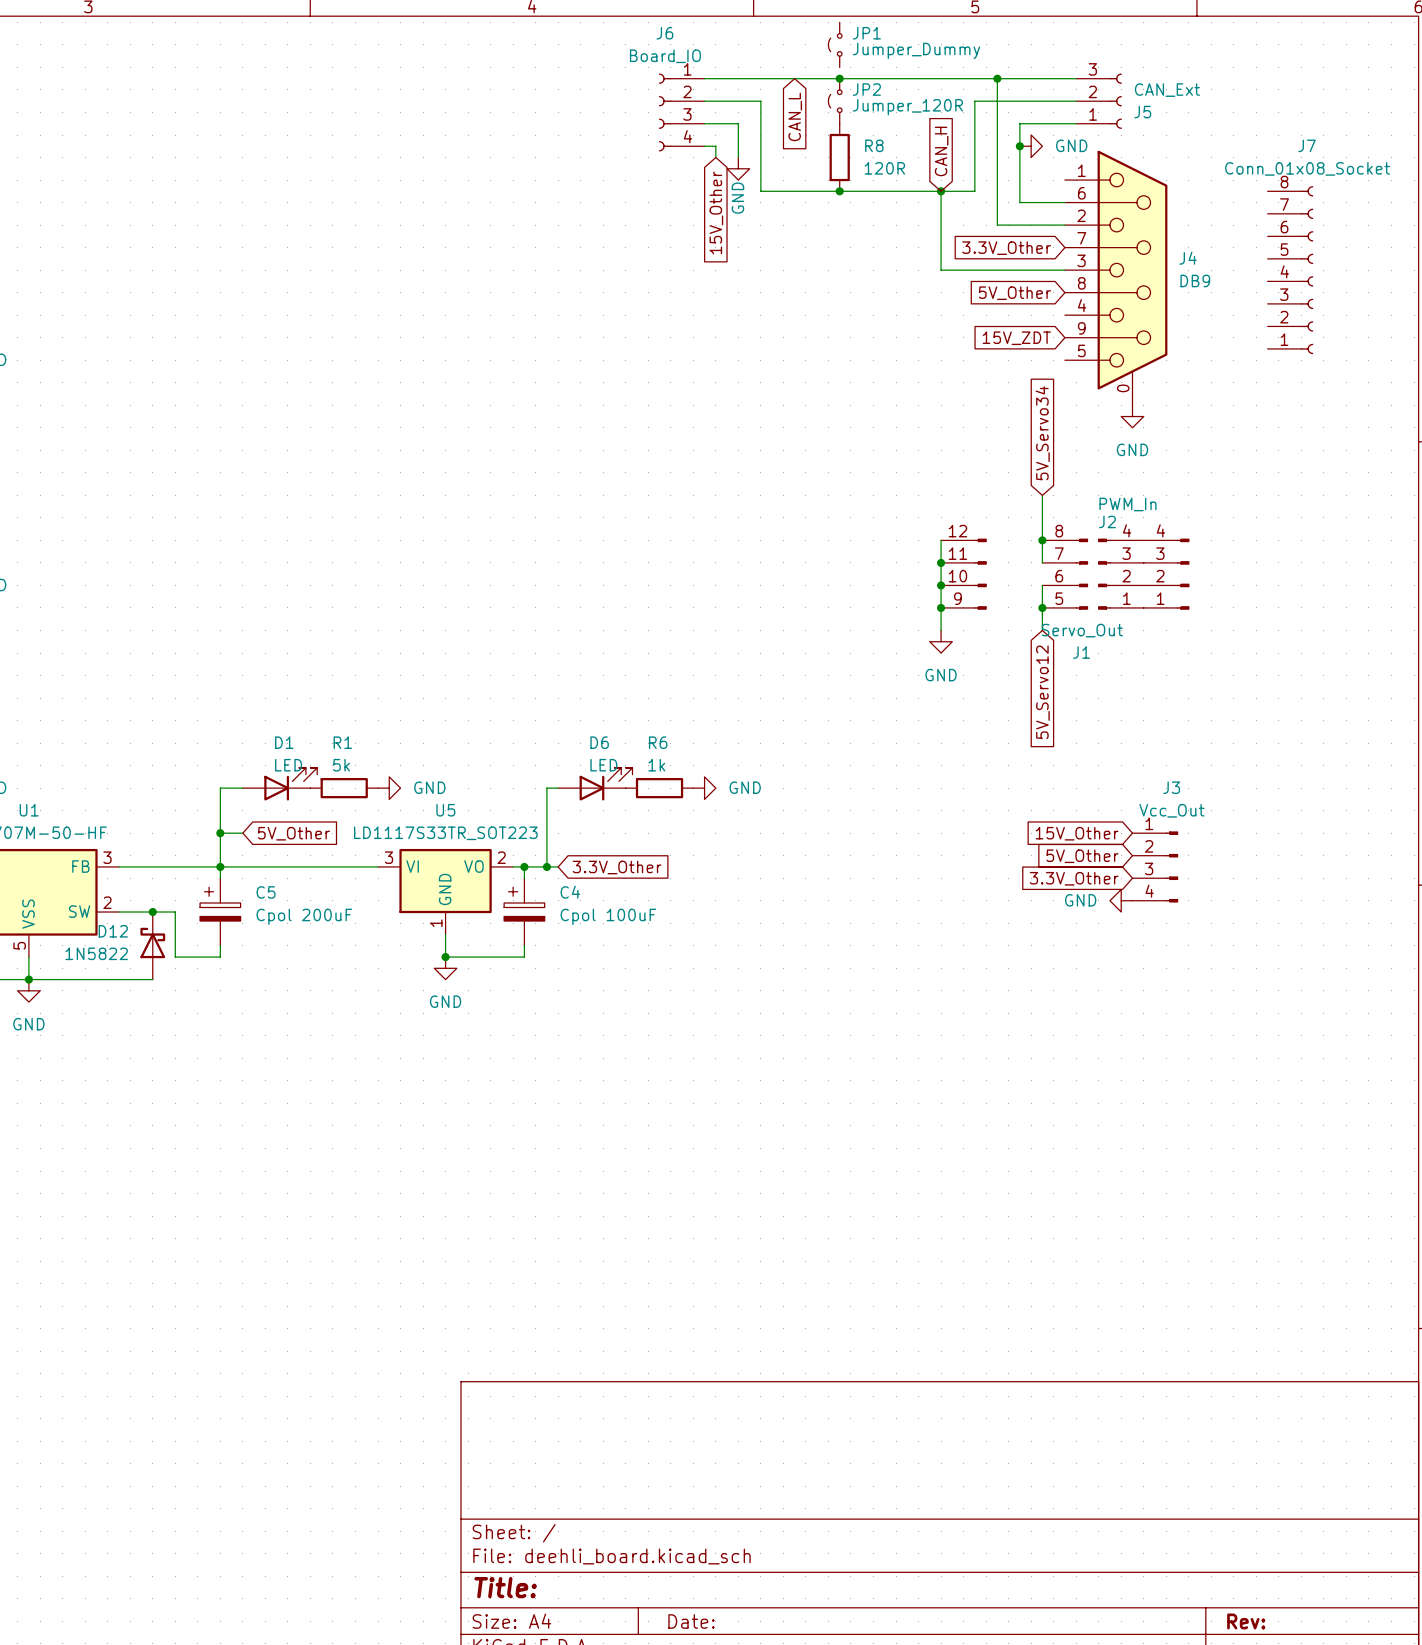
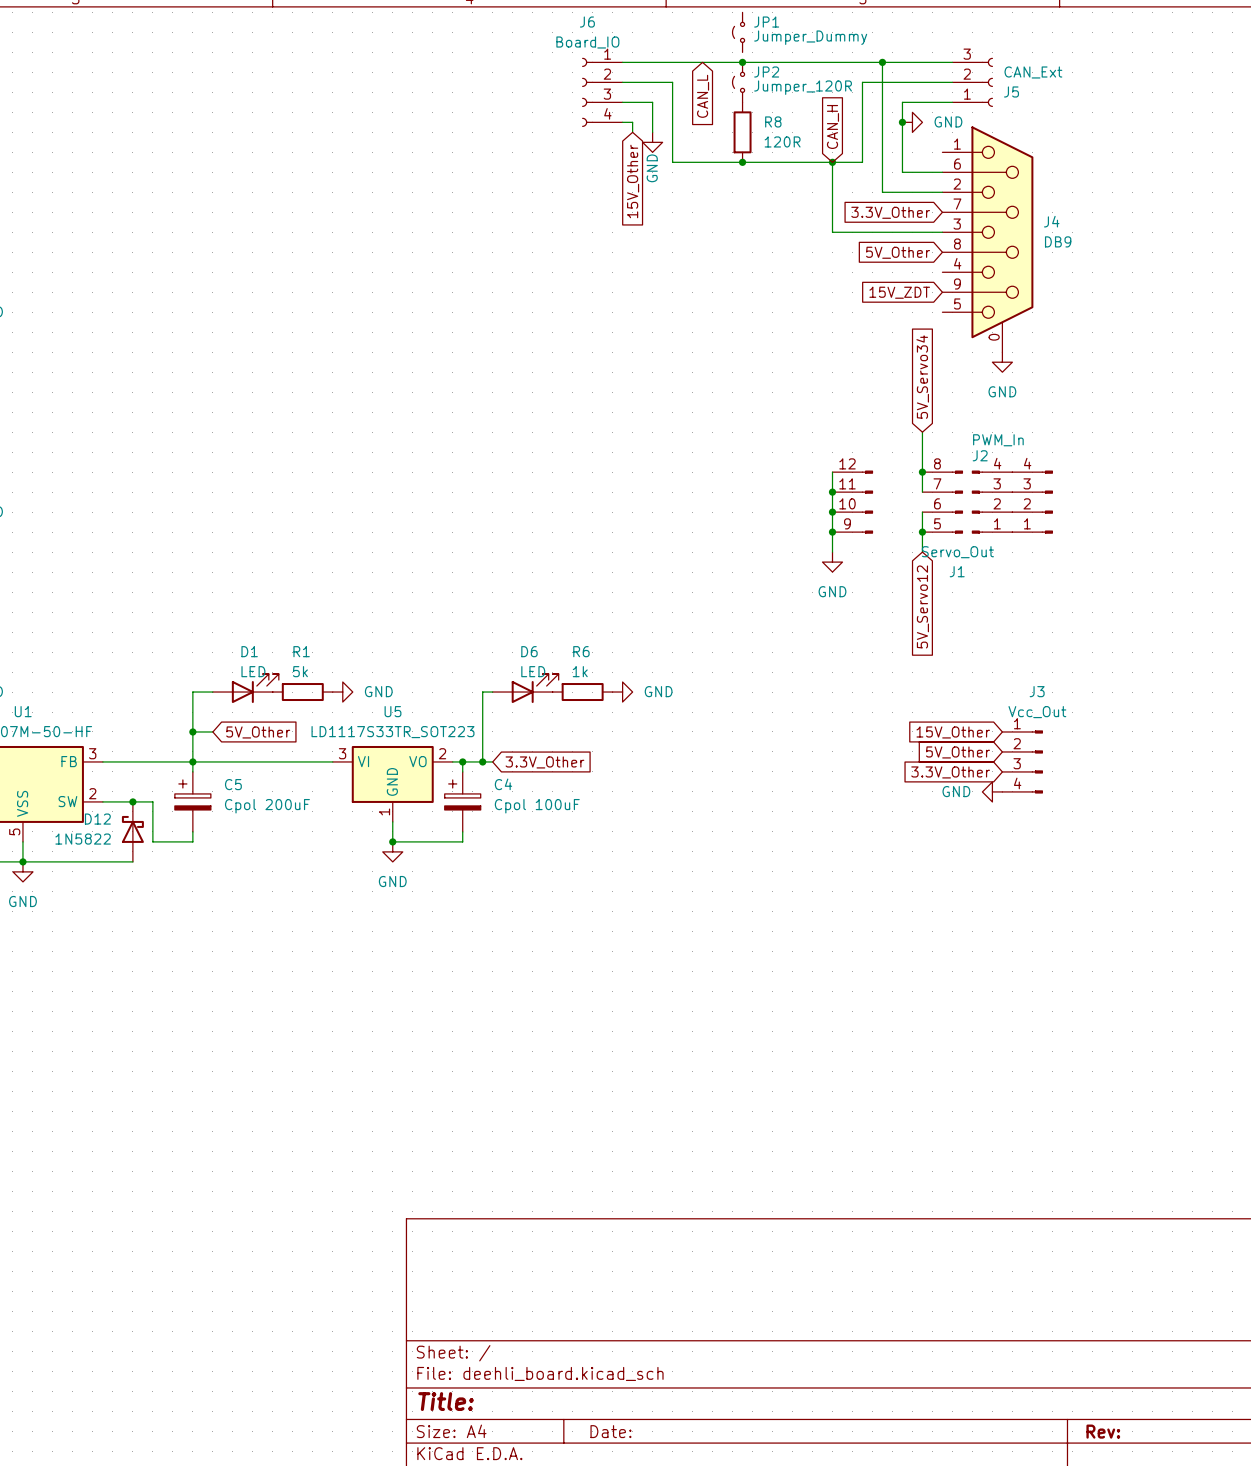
J7: Conn_01x08_Socket (1290, 270) -> none

